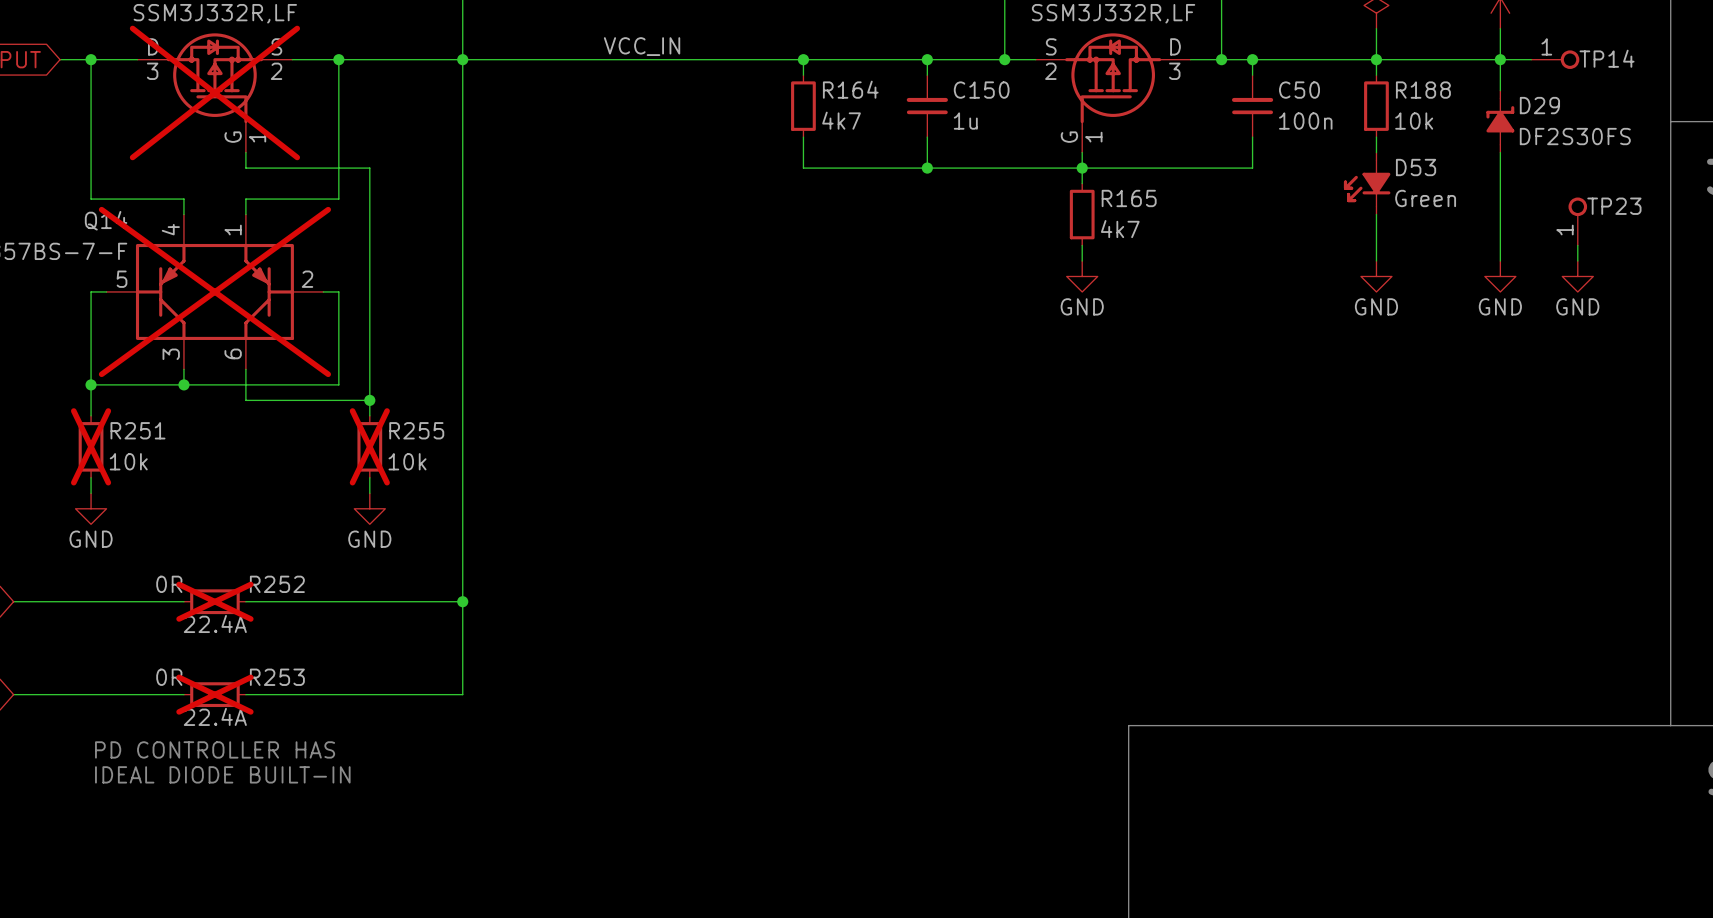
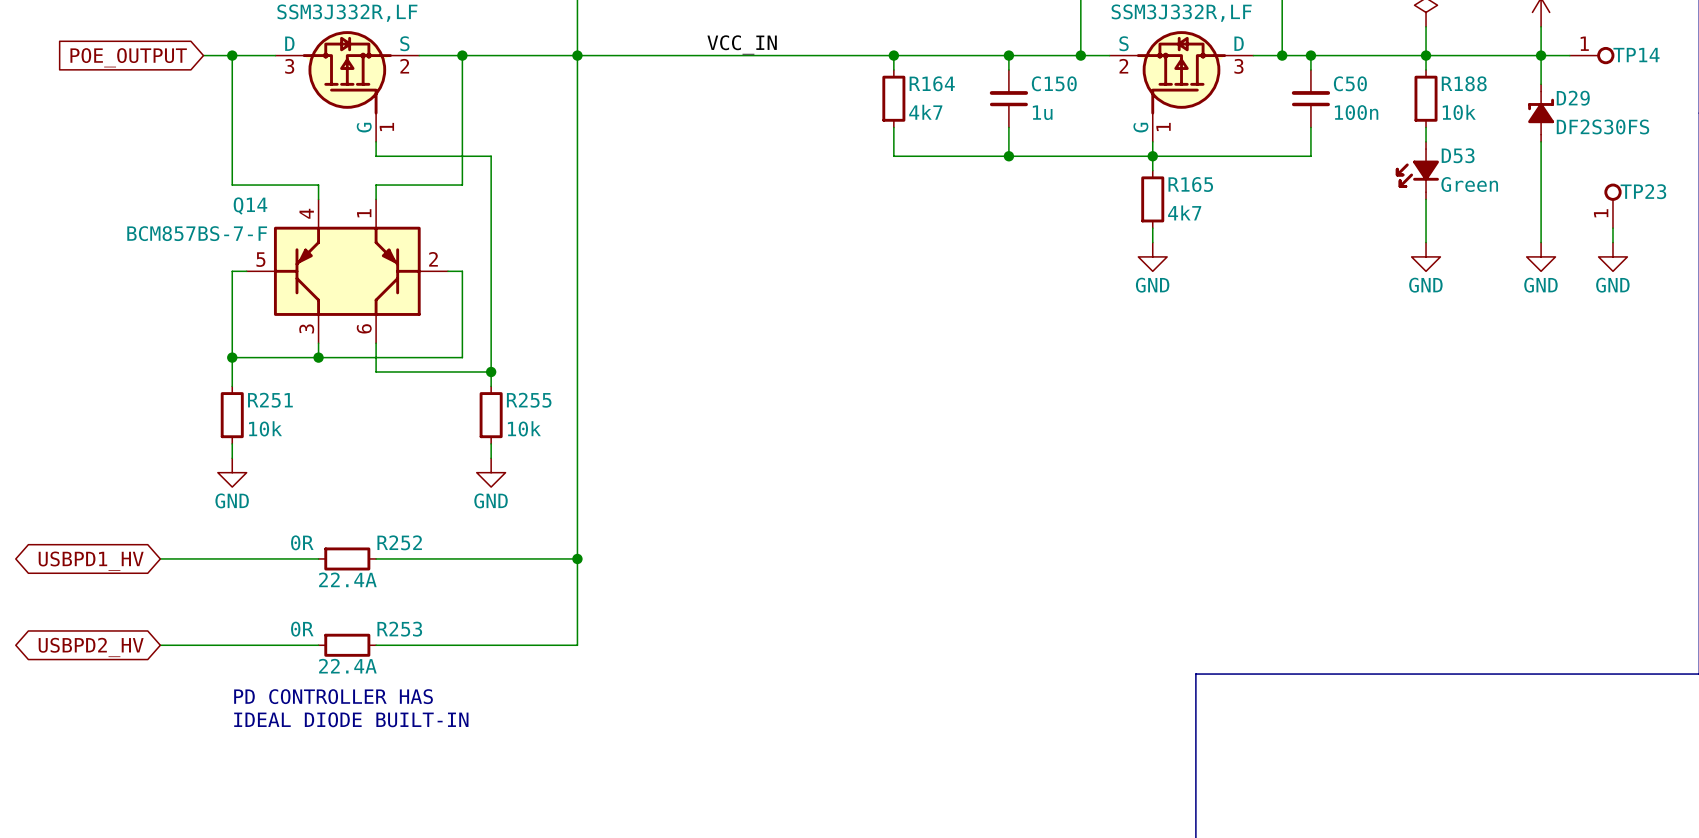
part do-not-place cross: (214, 92) -> none
Q14 do-not-place cross: (214, 291) -> none
R251 do-not-place cross: (91, 446) -> none
R255 do-not-place cross: (369, 446) -> none
R252 do-not-place cross: (214, 601) -> none
R253 do-not-place cross: (214, 694) -> none

